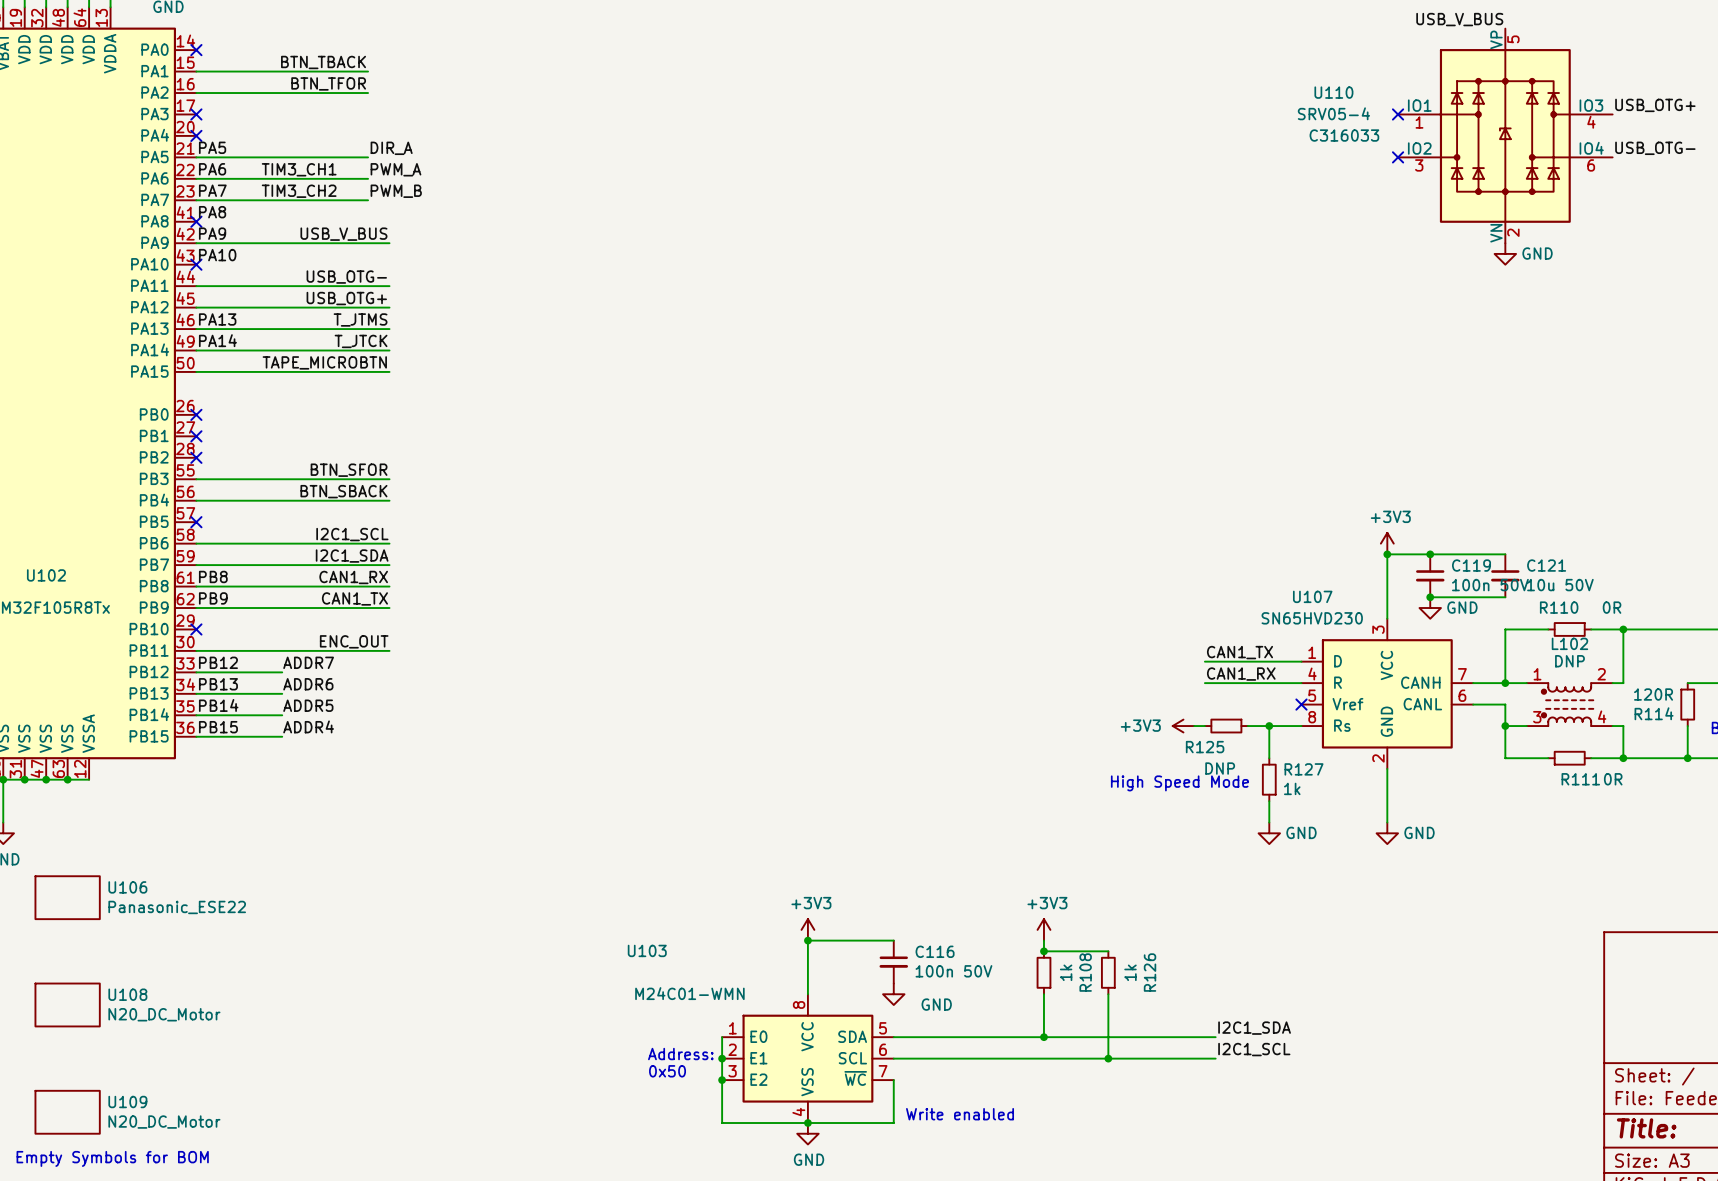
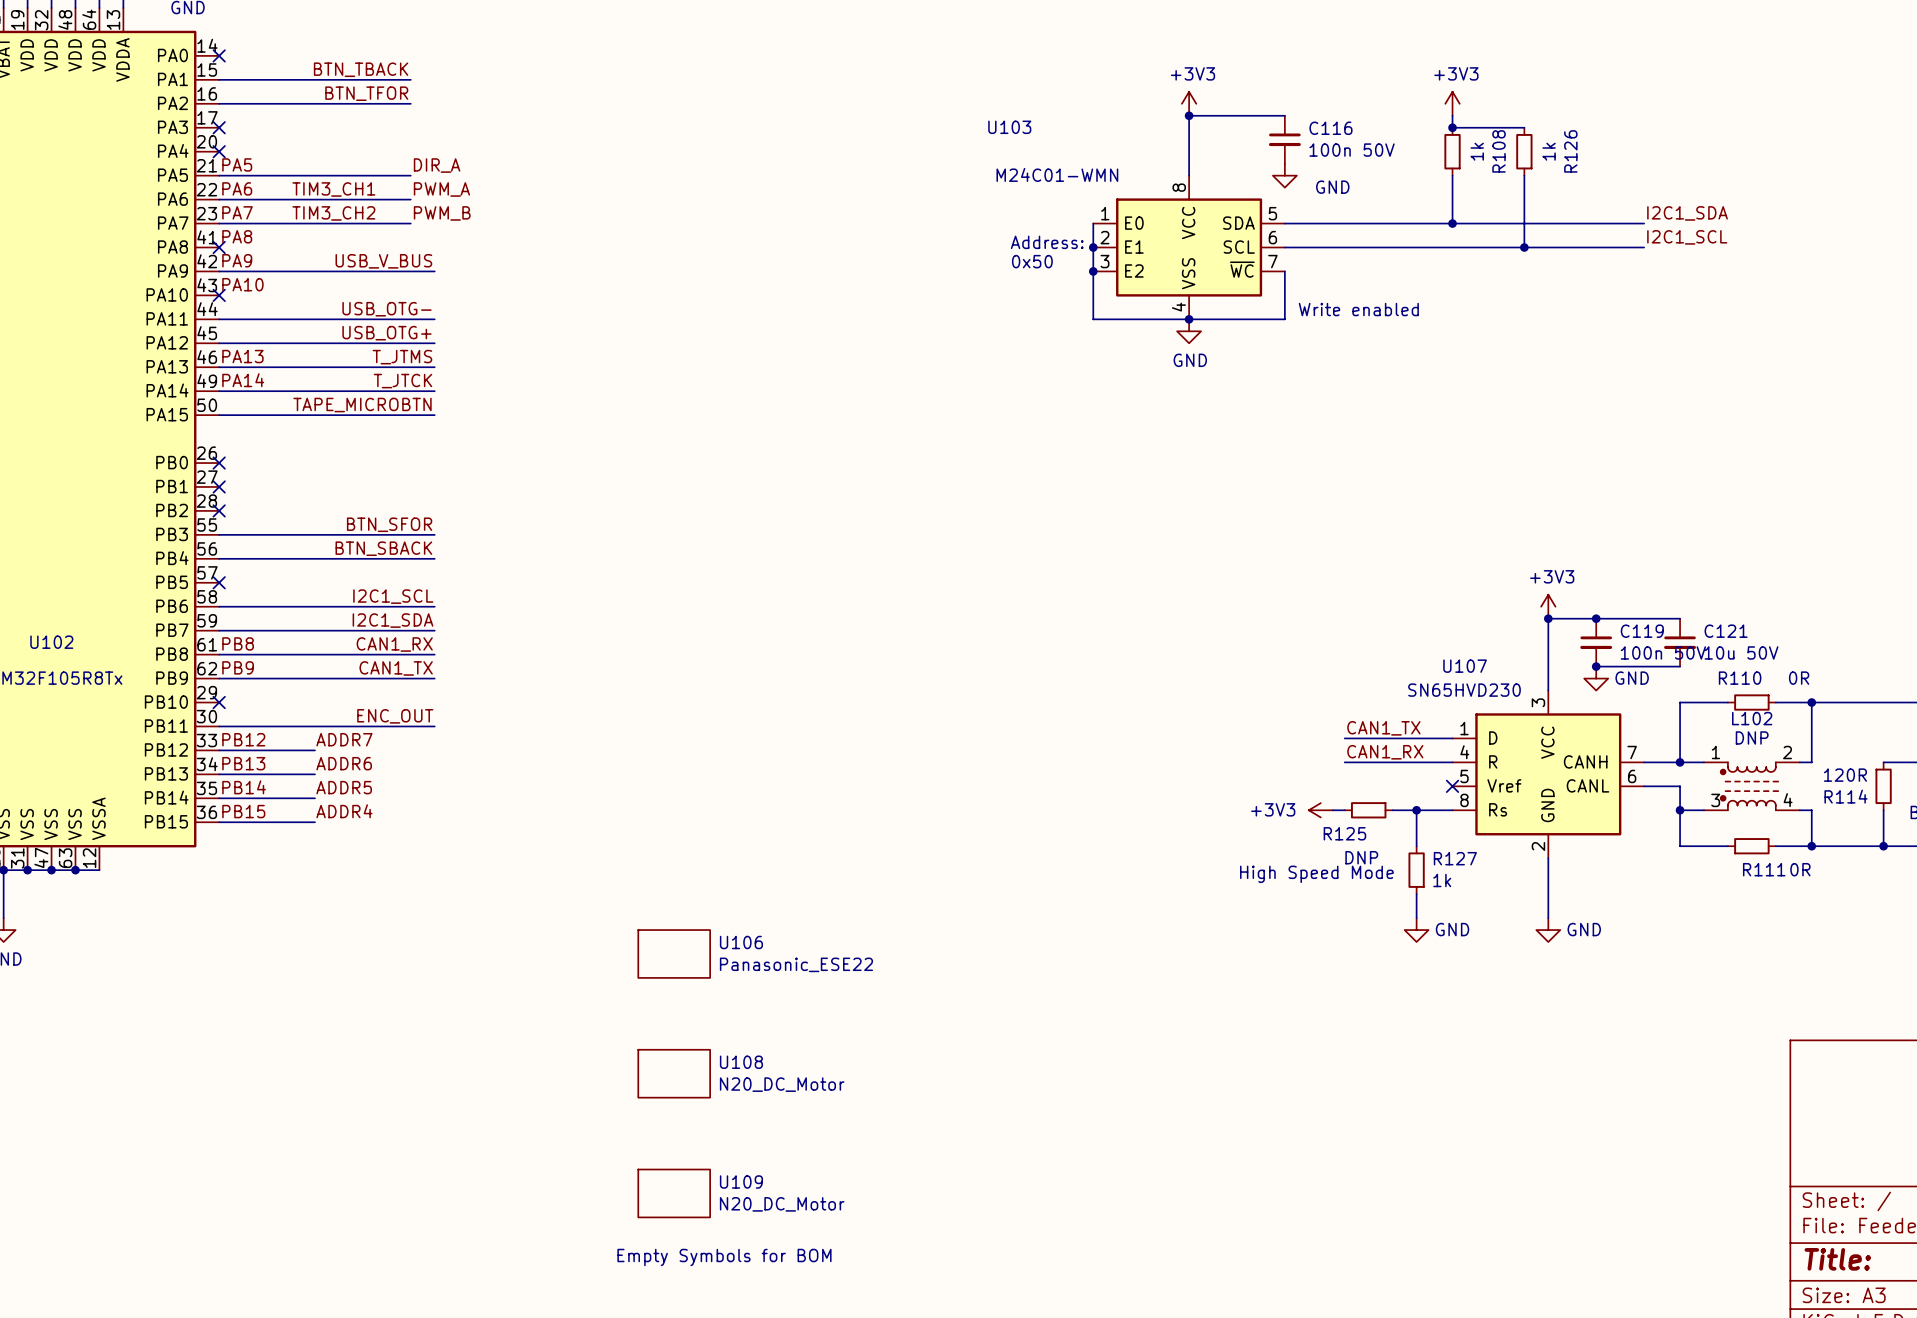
label: USB_V_BUS (1459, 19) -> none
power symbol: none -> +3V3 (1189, 103)
power symbol: none -> +3V3 (1452, 103)
junction: none -> (1189, 115)
wire: none -> (1284, 115) (1189, 115) (1189, 175)
wire: none -> (1452, 115) (1452, 127) (1524, 127)
label: USB_OTG+ (1655, 105) -> none
junction: none -> (1452, 127)
no-connect mark: (1398, 114) -> none
U110: SRV05-4 (1505, 135) -> none
label: USB_OTG- (1655, 148) -> none
power symbol: none -> GND (1284, 175)
wire: none -> (1452, 175) (1452, 223)
wire: none -> (1524, 175) (1524, 247)
no-connect mark: (1398, 157) -> none
label: none -> I2C1_SDA (1687, 213)
wire: none -> (1093, 223) (1093, 319) (1284, 319) (1284, 271)
wire: none -> (1284, 223) (1644, 223)
junction: none -> (1452, 223)
label: none -> I2C1_SCL (1687, 237)
text: none -> Address: (1047, 242)
junction: none -> (1093, 247)
wire: none -> (1284, 247) (1644, 247)
junction: none -> (1524, 247)
text: none -> 0x50 (1032, 261)
junction: none -> (1093, 271)
power symbol: GND (1505, 253) -> none
text: none -> Write enabled (1358, 309)
junction: none -> (1189, 319)
power symbol: none -> GND (1189, 331)
U106 position: (67, 897) -> (674, 953)
power symbol: +3V3 (807, 929) -> none
power symbol: +3V3 (1043, 929) -> none
junction: (807, 940) -> none
wire: (893, 940) (807, 940) (807, 994) -> none
wire: (1043, 940) (1043, 951) (1108, 951) -> none
junction: (1043, 951) -> none
C116 position: (893, 962) -> (1284, 139)
R108 position: (1043, 972) -> (1452, 151)
R126 position: (1108, 972) -> (1524, 151)
power symbol: GND (893, 994) -> none
wire: (1043, 994) (1043, 1037) -> none
wire: (1108, 994) (1108, 1058) -> none
U108 position: (67, 1004) -> (674, 1073)
label: I2C1_SDA (1254, 1028) -> none
wire: (722, 1037) (722, 1123) (893, 1123) (893, 1080) -> none
wire: (893, 1037) (1215, 1037) -> none
junction: (1043, 1037) -> none
label: I2C1_SCL (1254, 1049) -> none
text: Address: (680, 1054) -> none
junction: (722, 1058) -> none
U103 position: (807, 1058) -> (1189, 247)
wire: (893, 1058) (1215, 1058) -> none
junction: (1108, 1058) -> none
text: 0x50 (667, 1071) -> none
junction: (722, 1080) -> none
U109 position: (67, 1112) -> (674, 1193)
text: Write enabled (960, 1114) -> none
junction: (807, 1123) -> none
text: none -> Empty Symbols for BOM (724, 1257)
power symbol: GND (807, 1133) -> none
text: Empty Symbols for BOM (112, 1158) -> none

